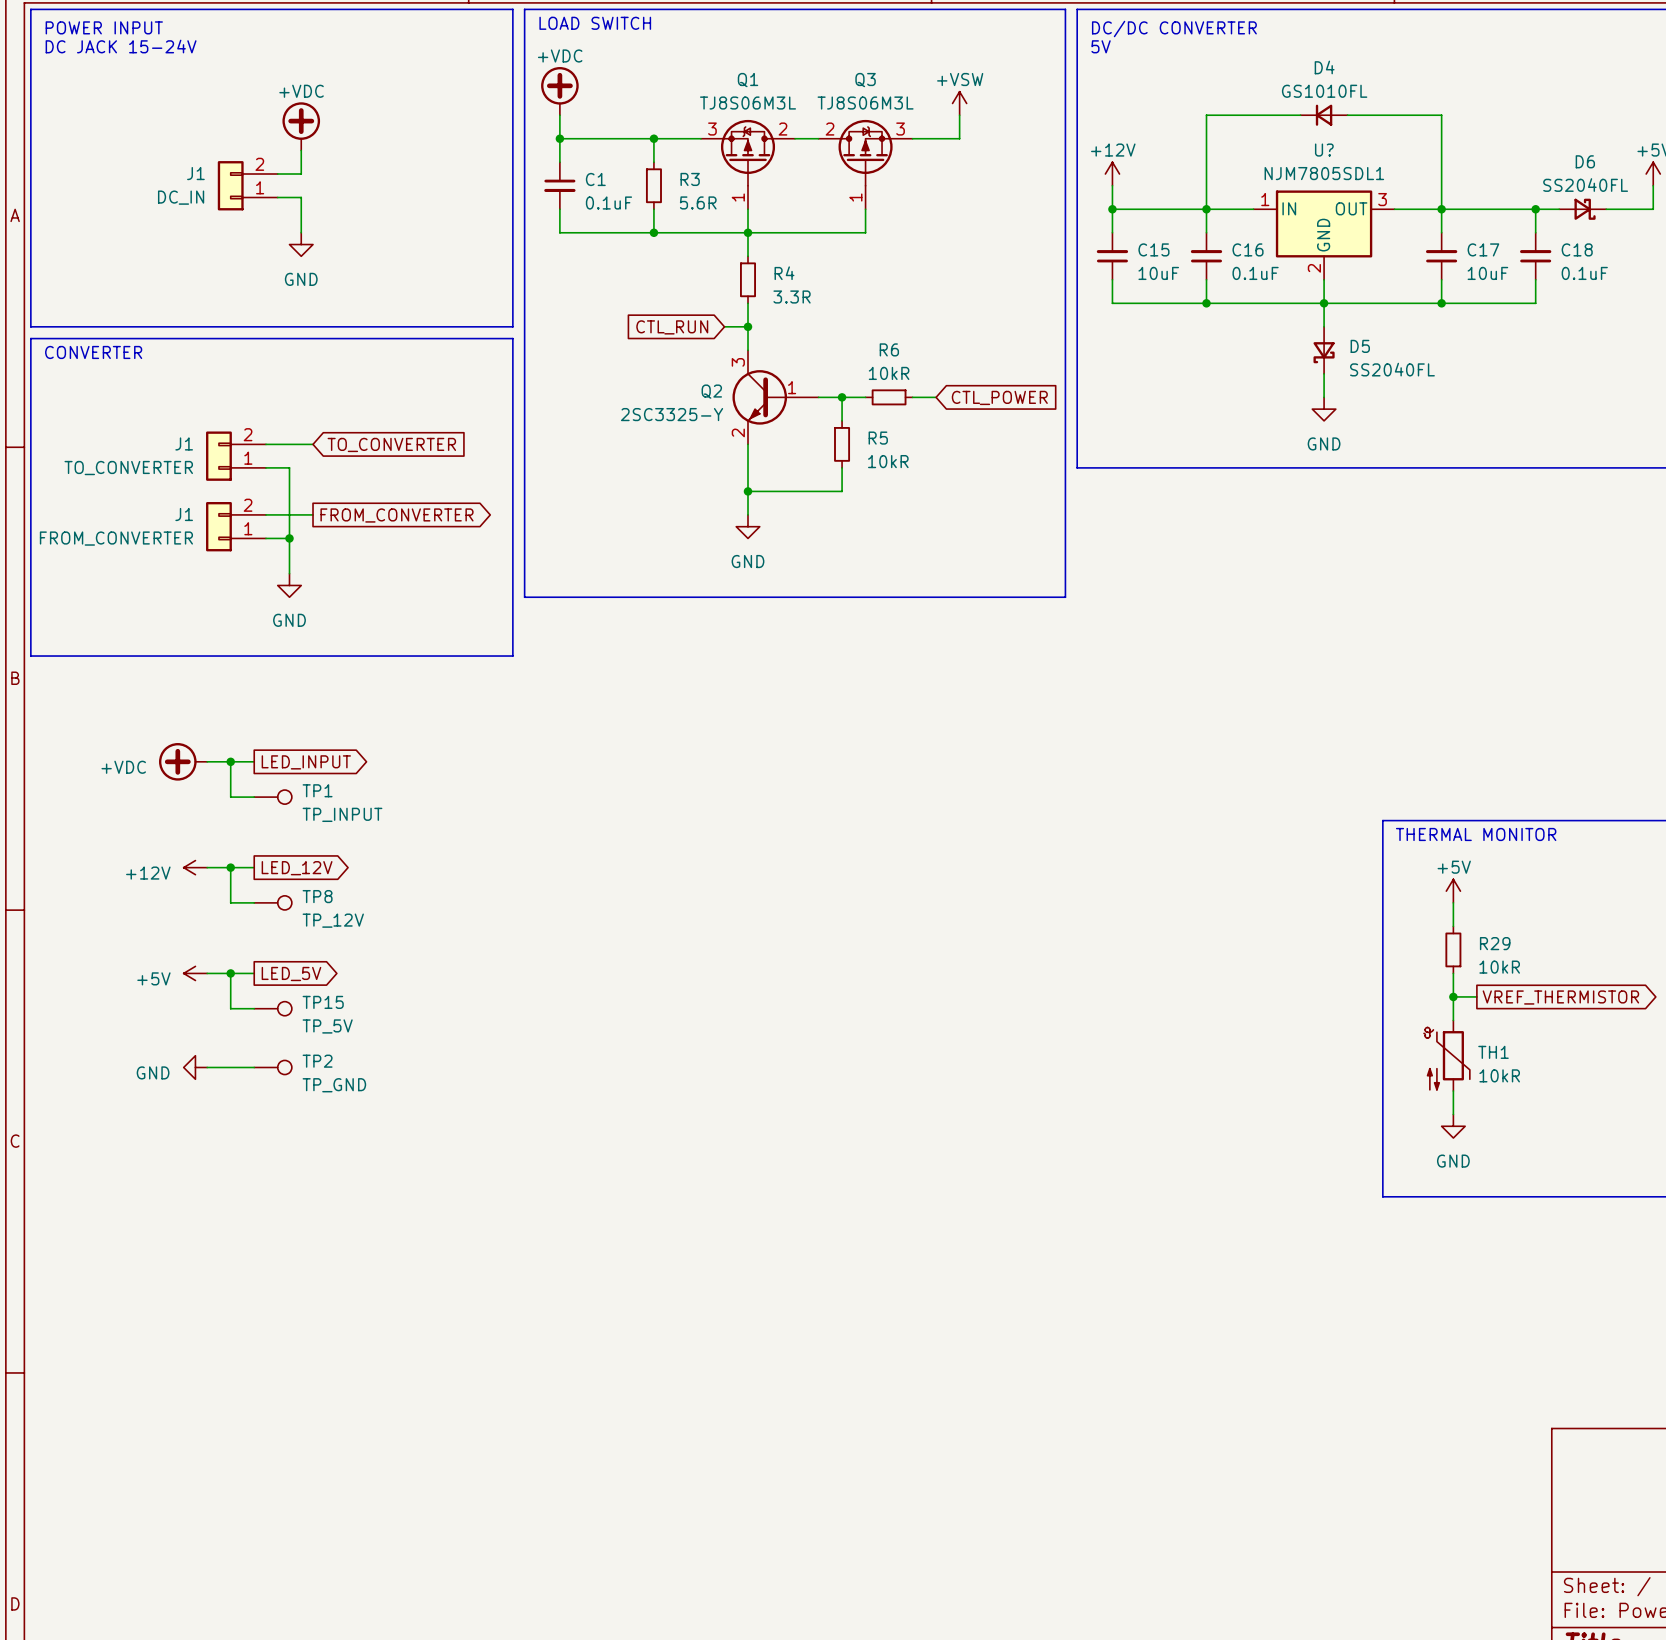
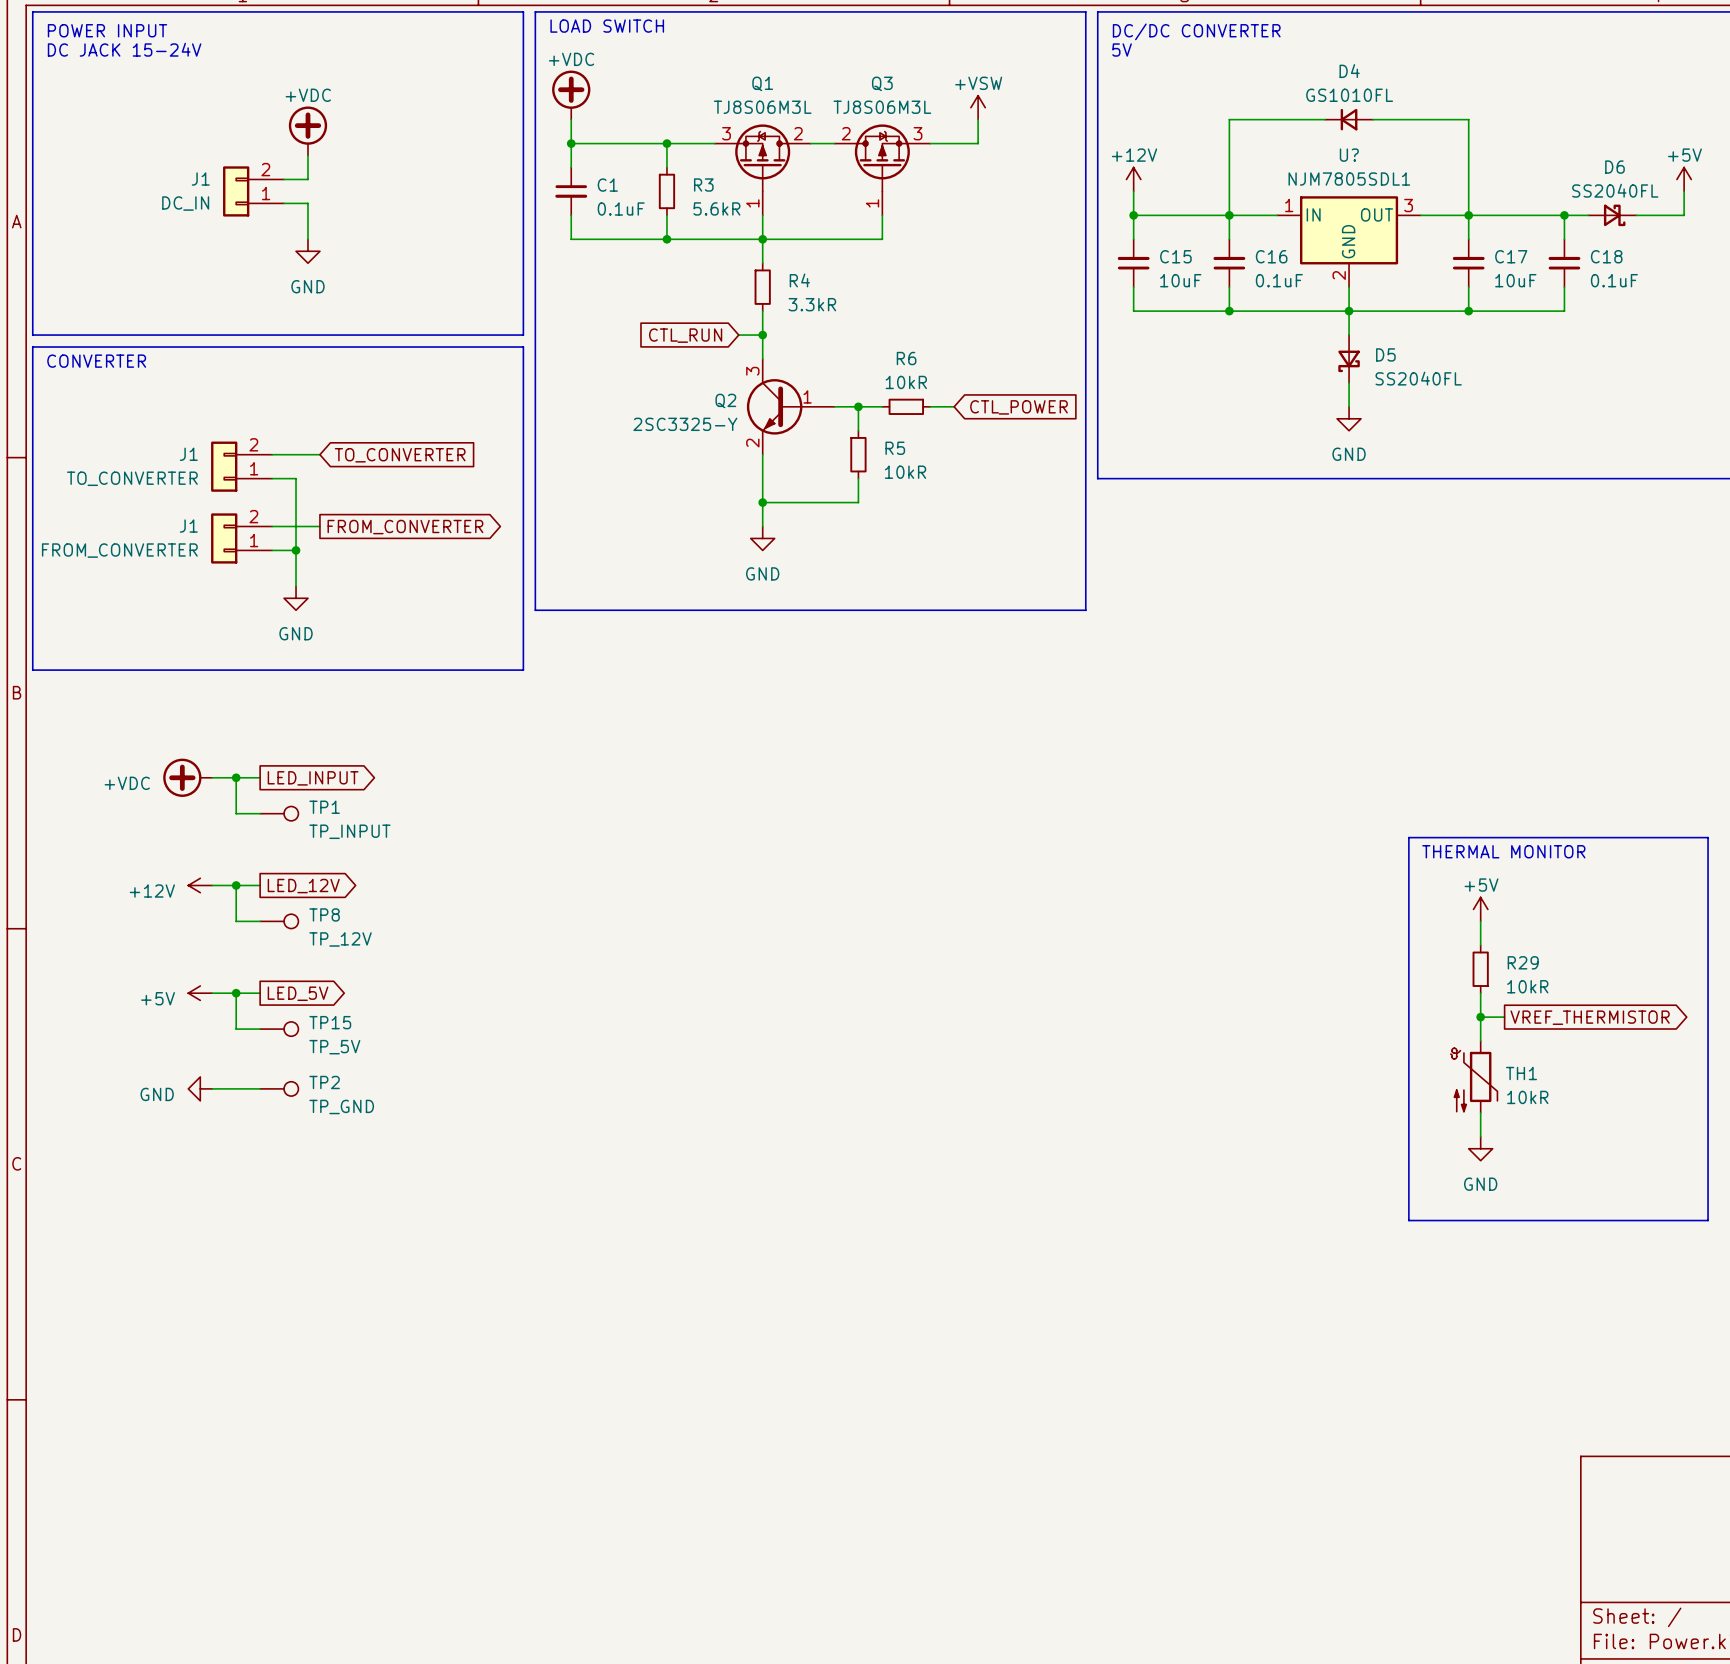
R3 value: 5.6R (698, 202) -> 5.6kR (716, 208)
R4 value: 3.3R (792, 297) -> 3.3kR (812, 304)

